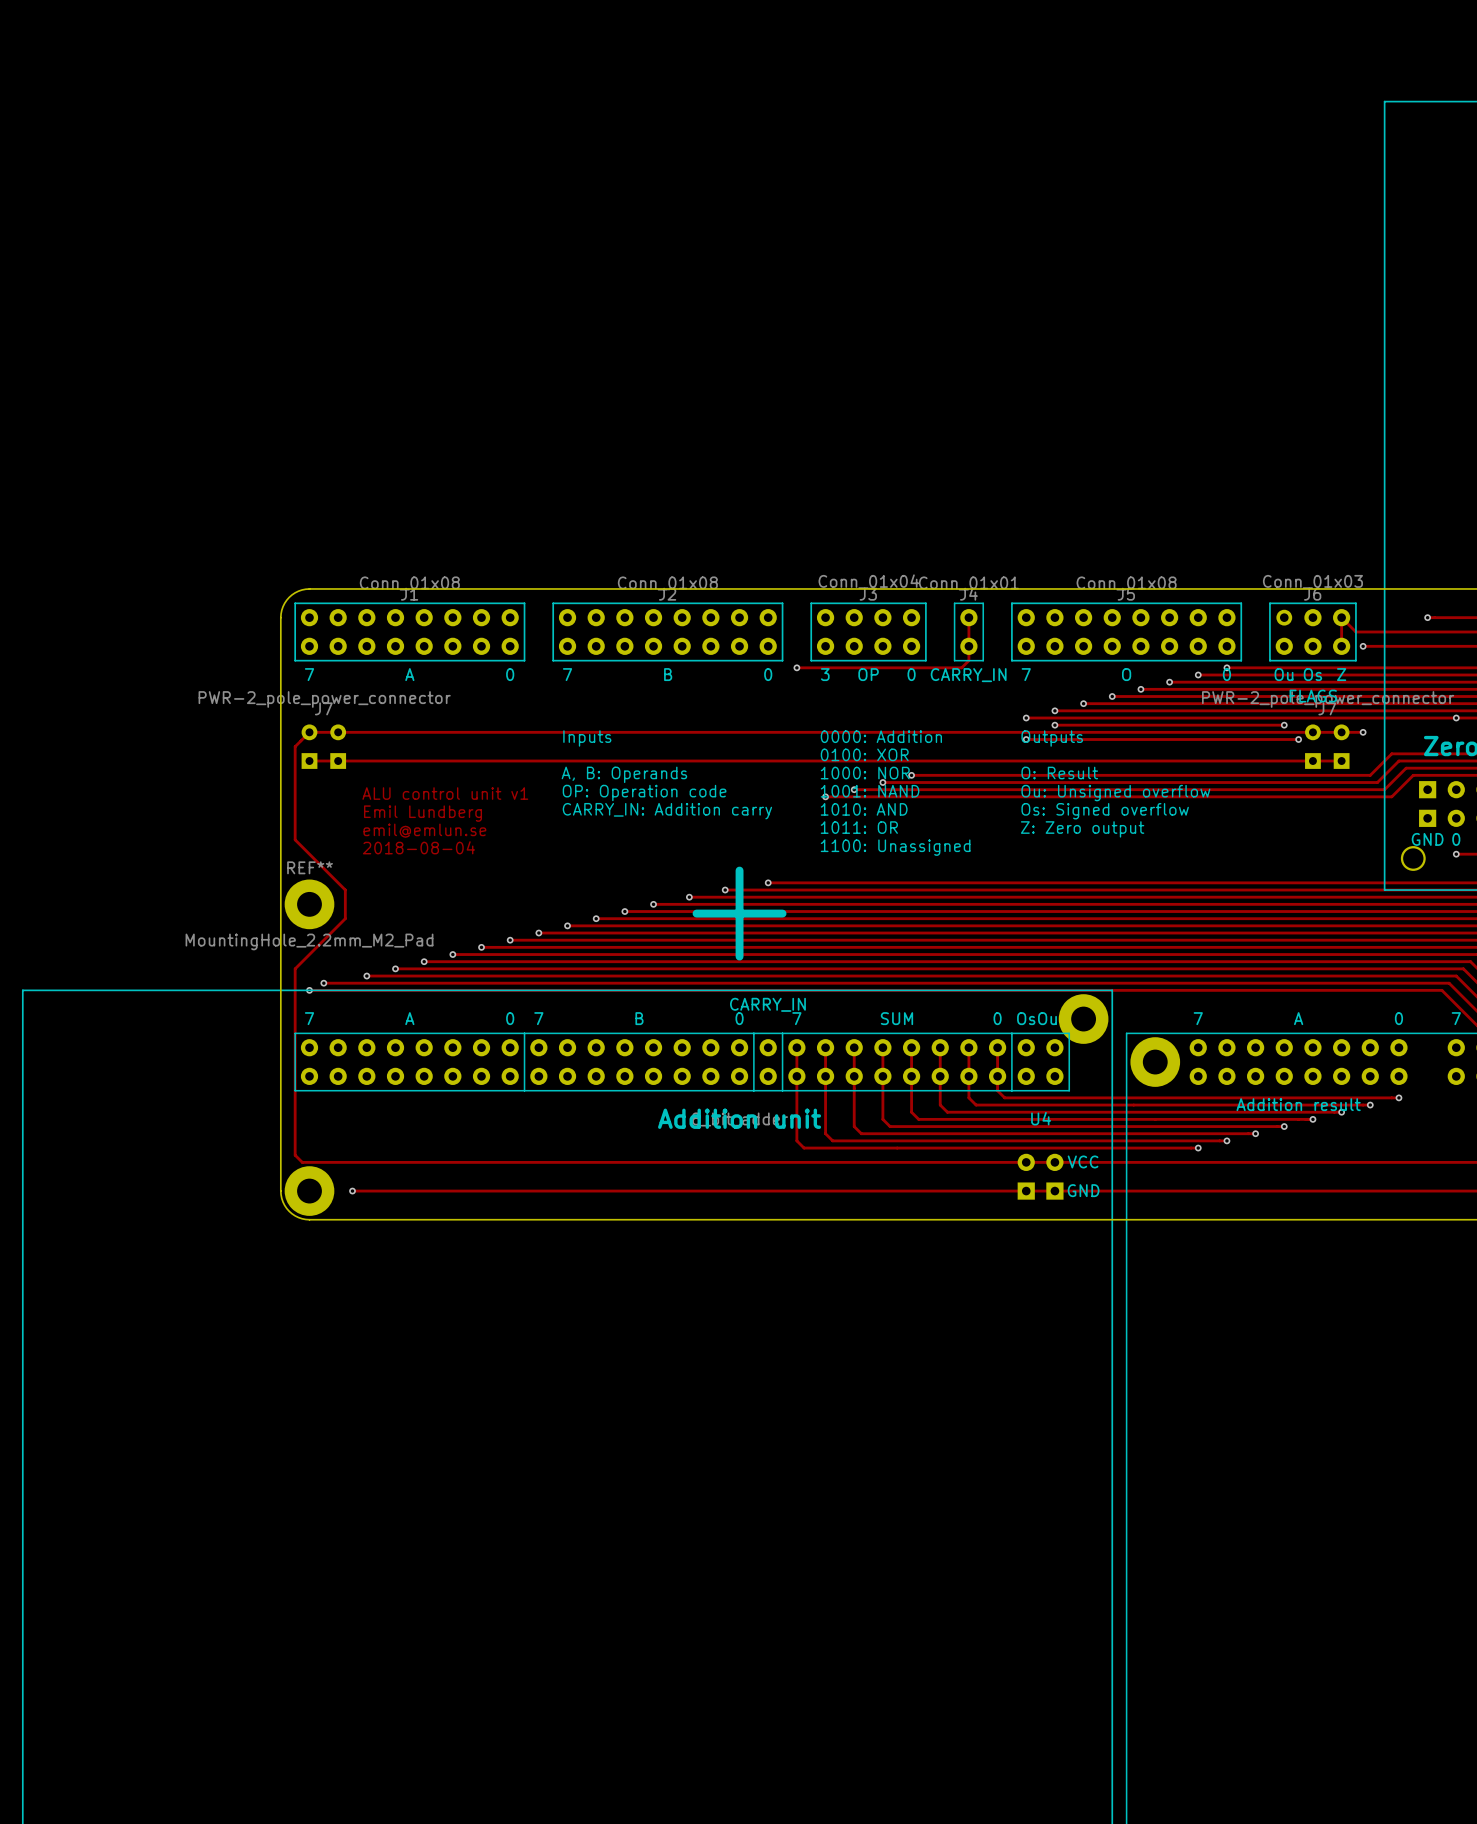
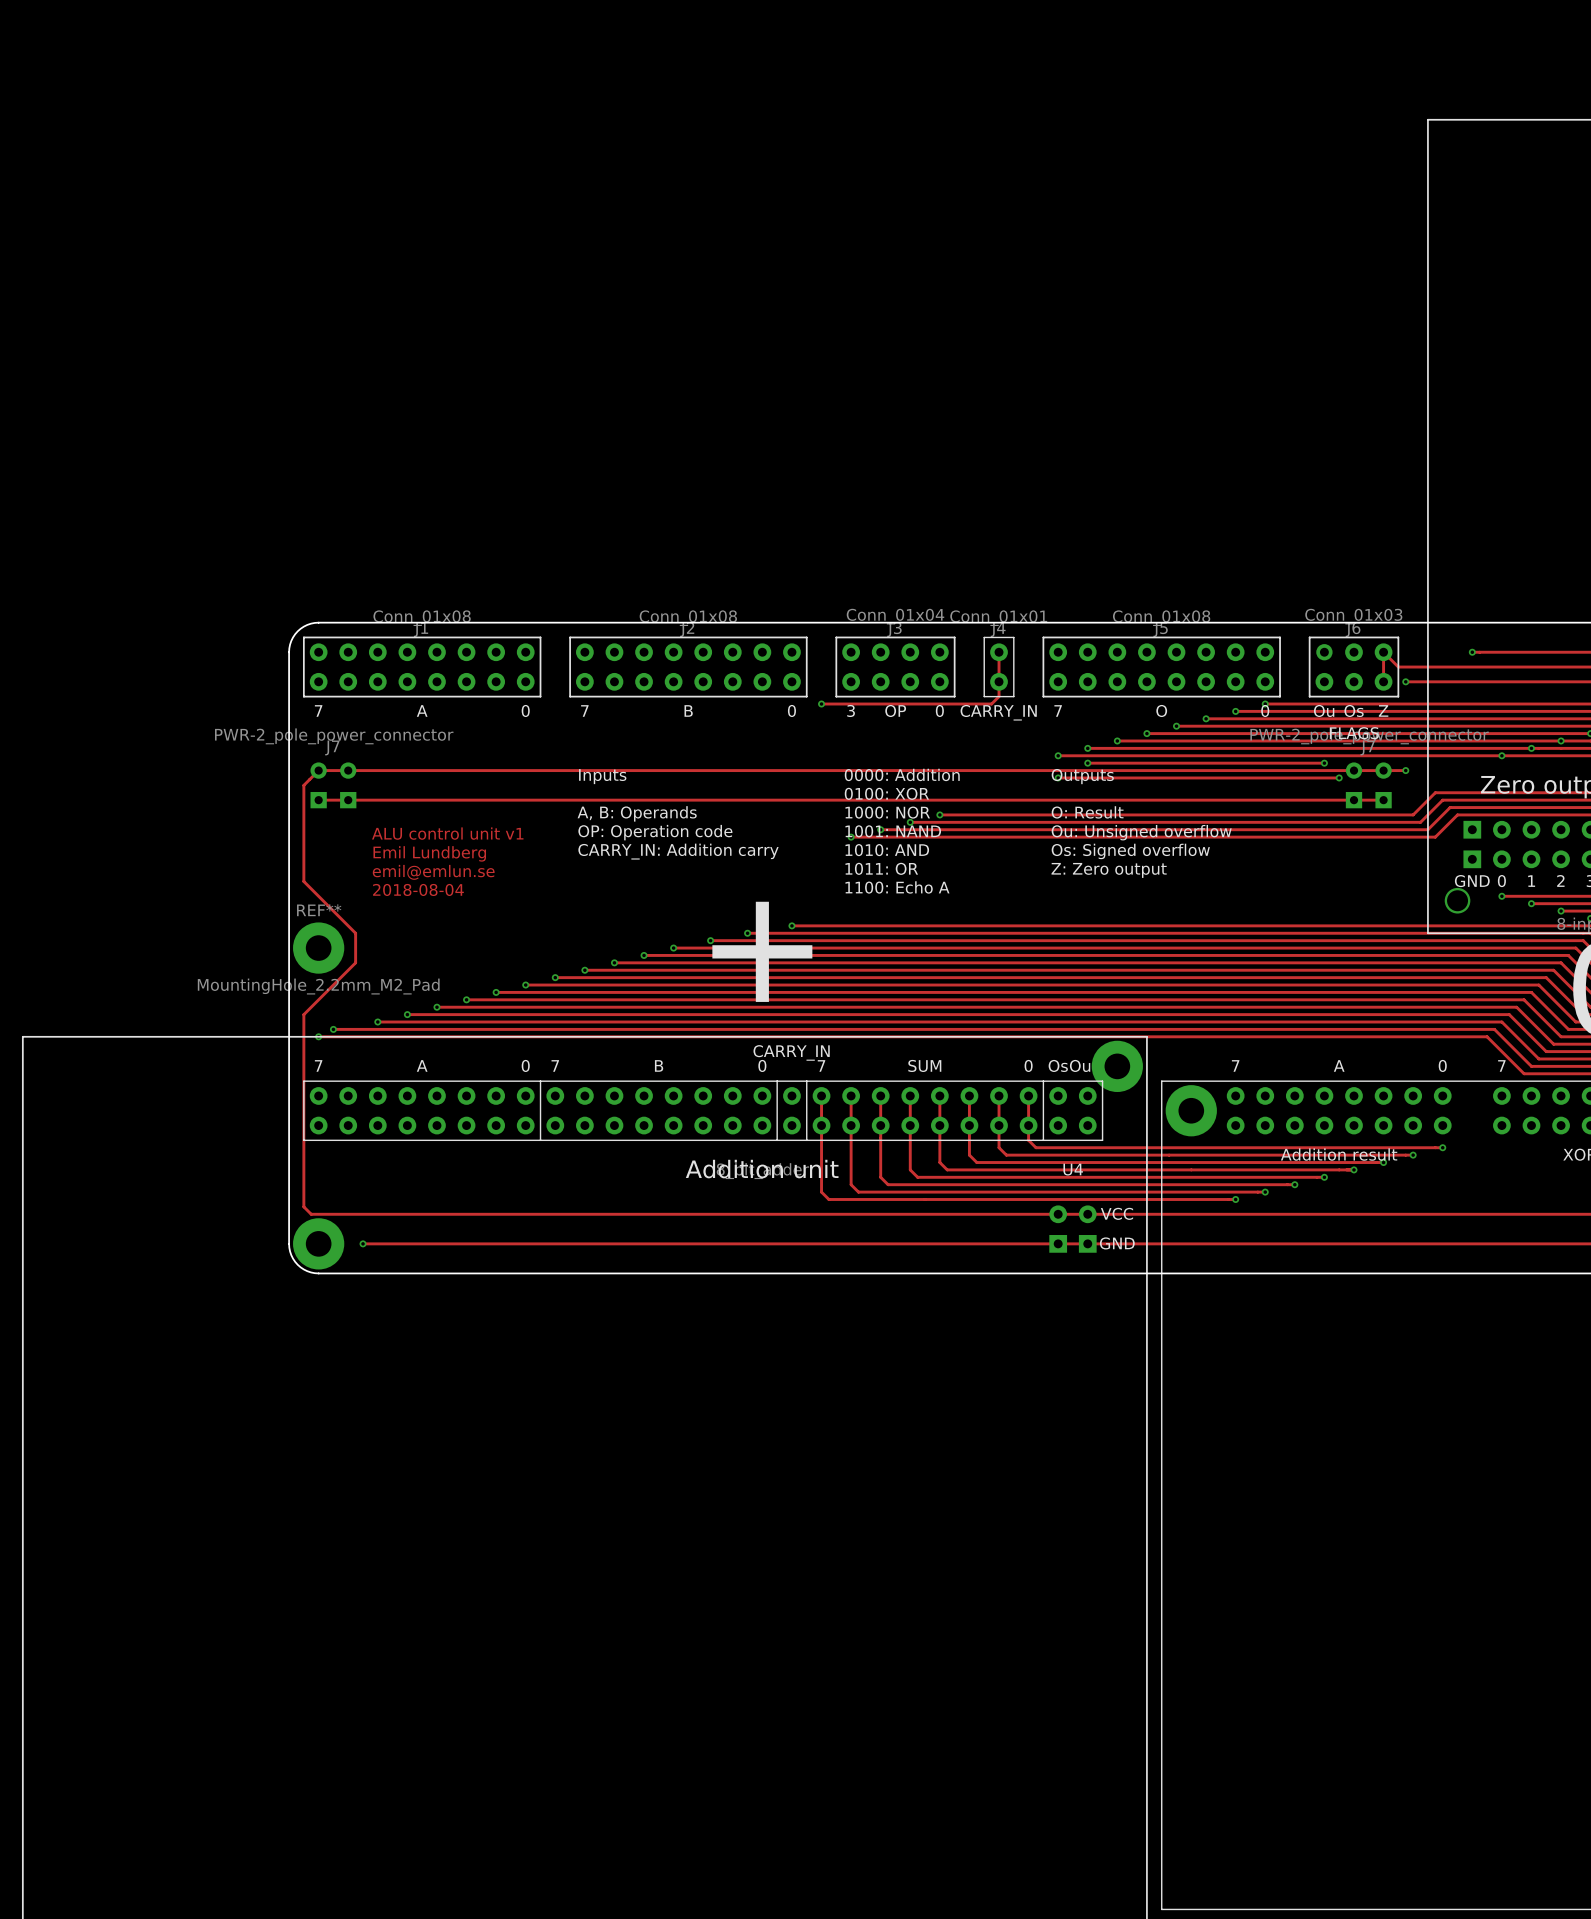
text: 1100: Unassigned (895, 847) -> 1100: Echo A (897, 887)

